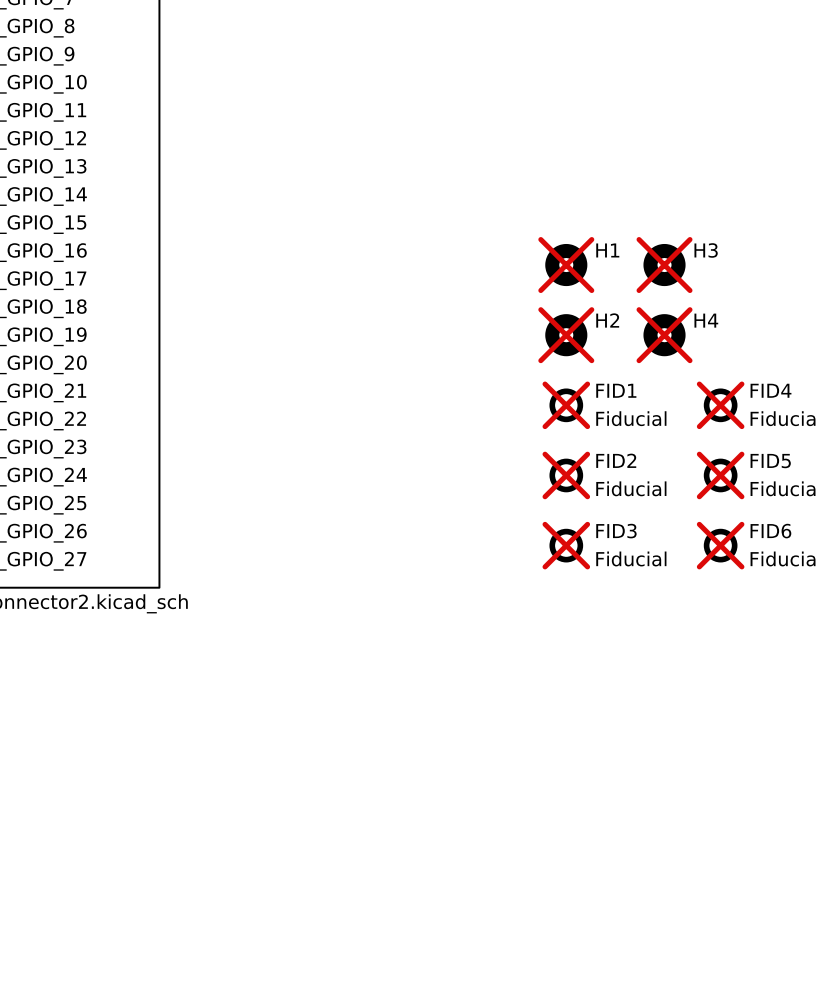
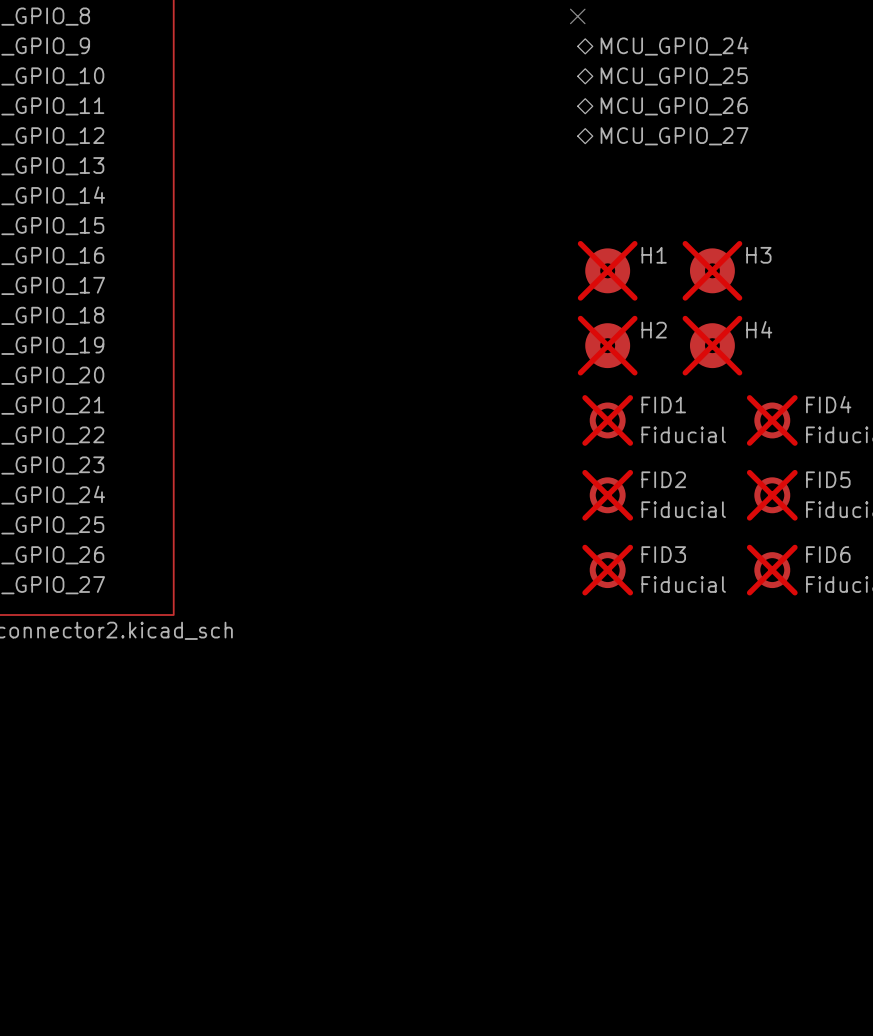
no-connect mark: none -> (577, 16)
sheet pin: none -> MCU_GPIO_24 (674, 46)
sheet pin: none -> MCU_GPIO_25 (674, 76)
sheet pin: none -> MCU_GPIO_26 (674, 106)
sheet pin: none -> MCU_GPIO_27 (674, 136)

